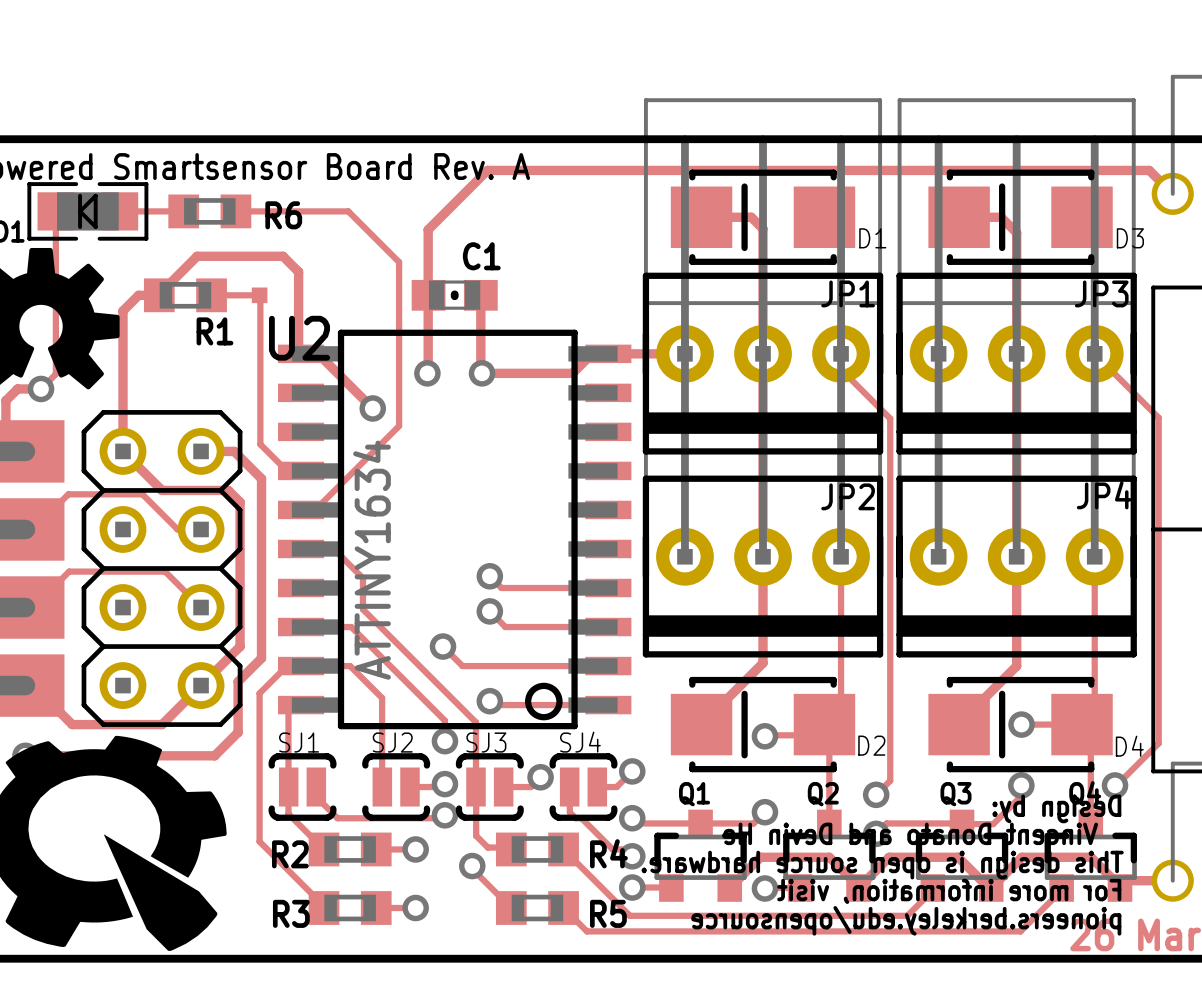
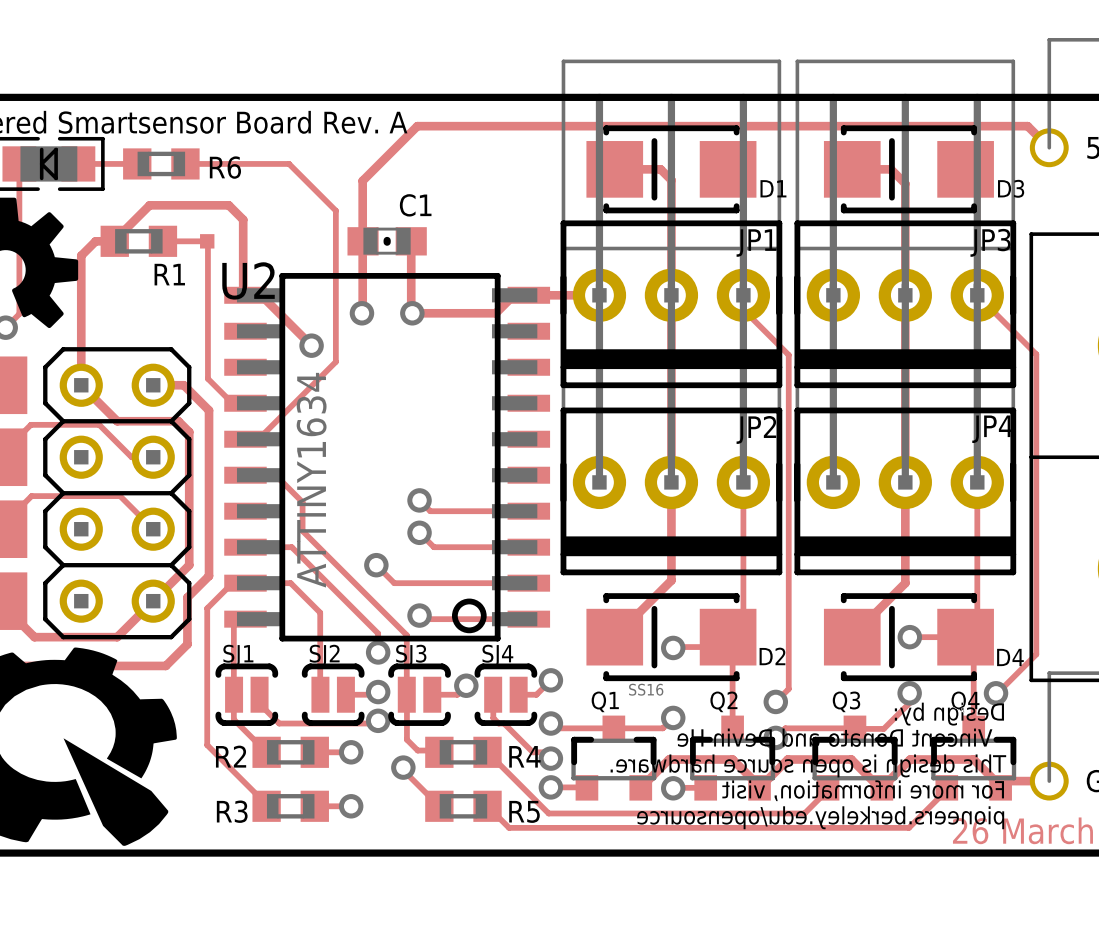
D2 value: none -> SS16 (646, 689)

